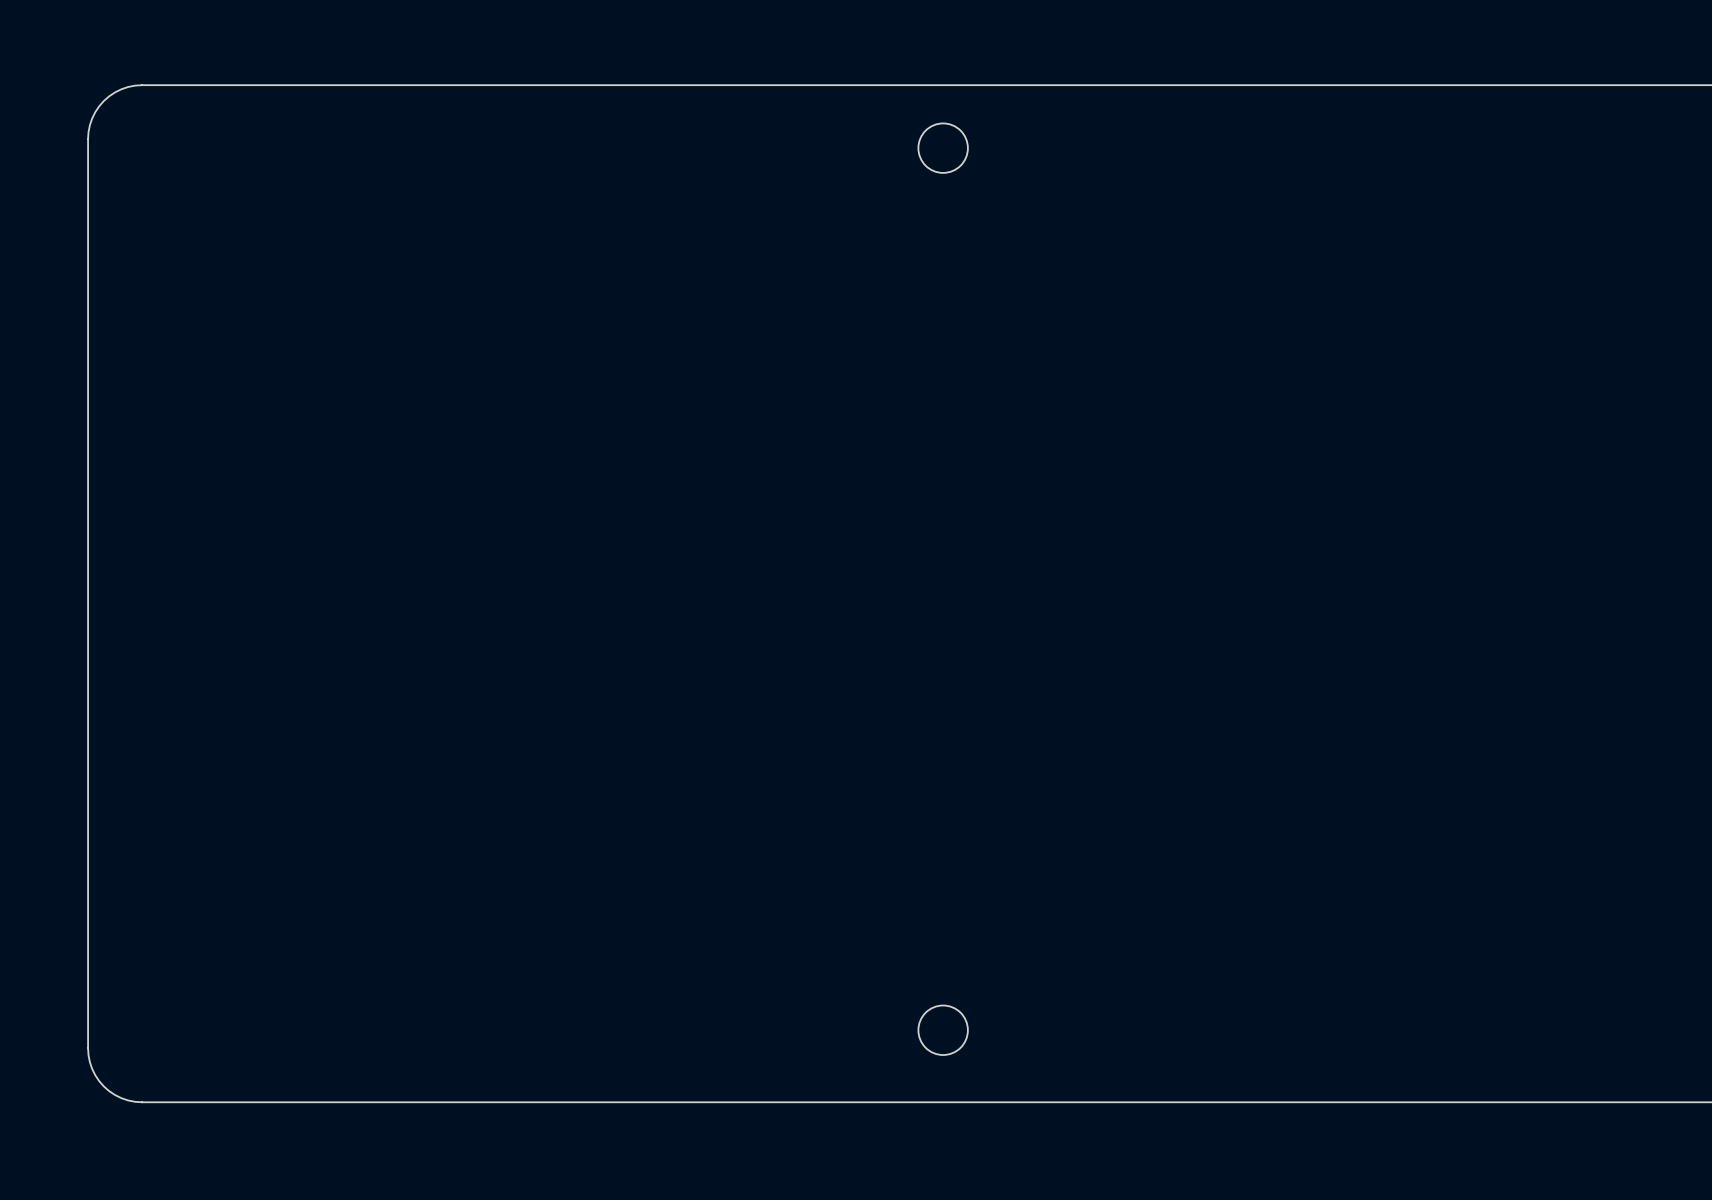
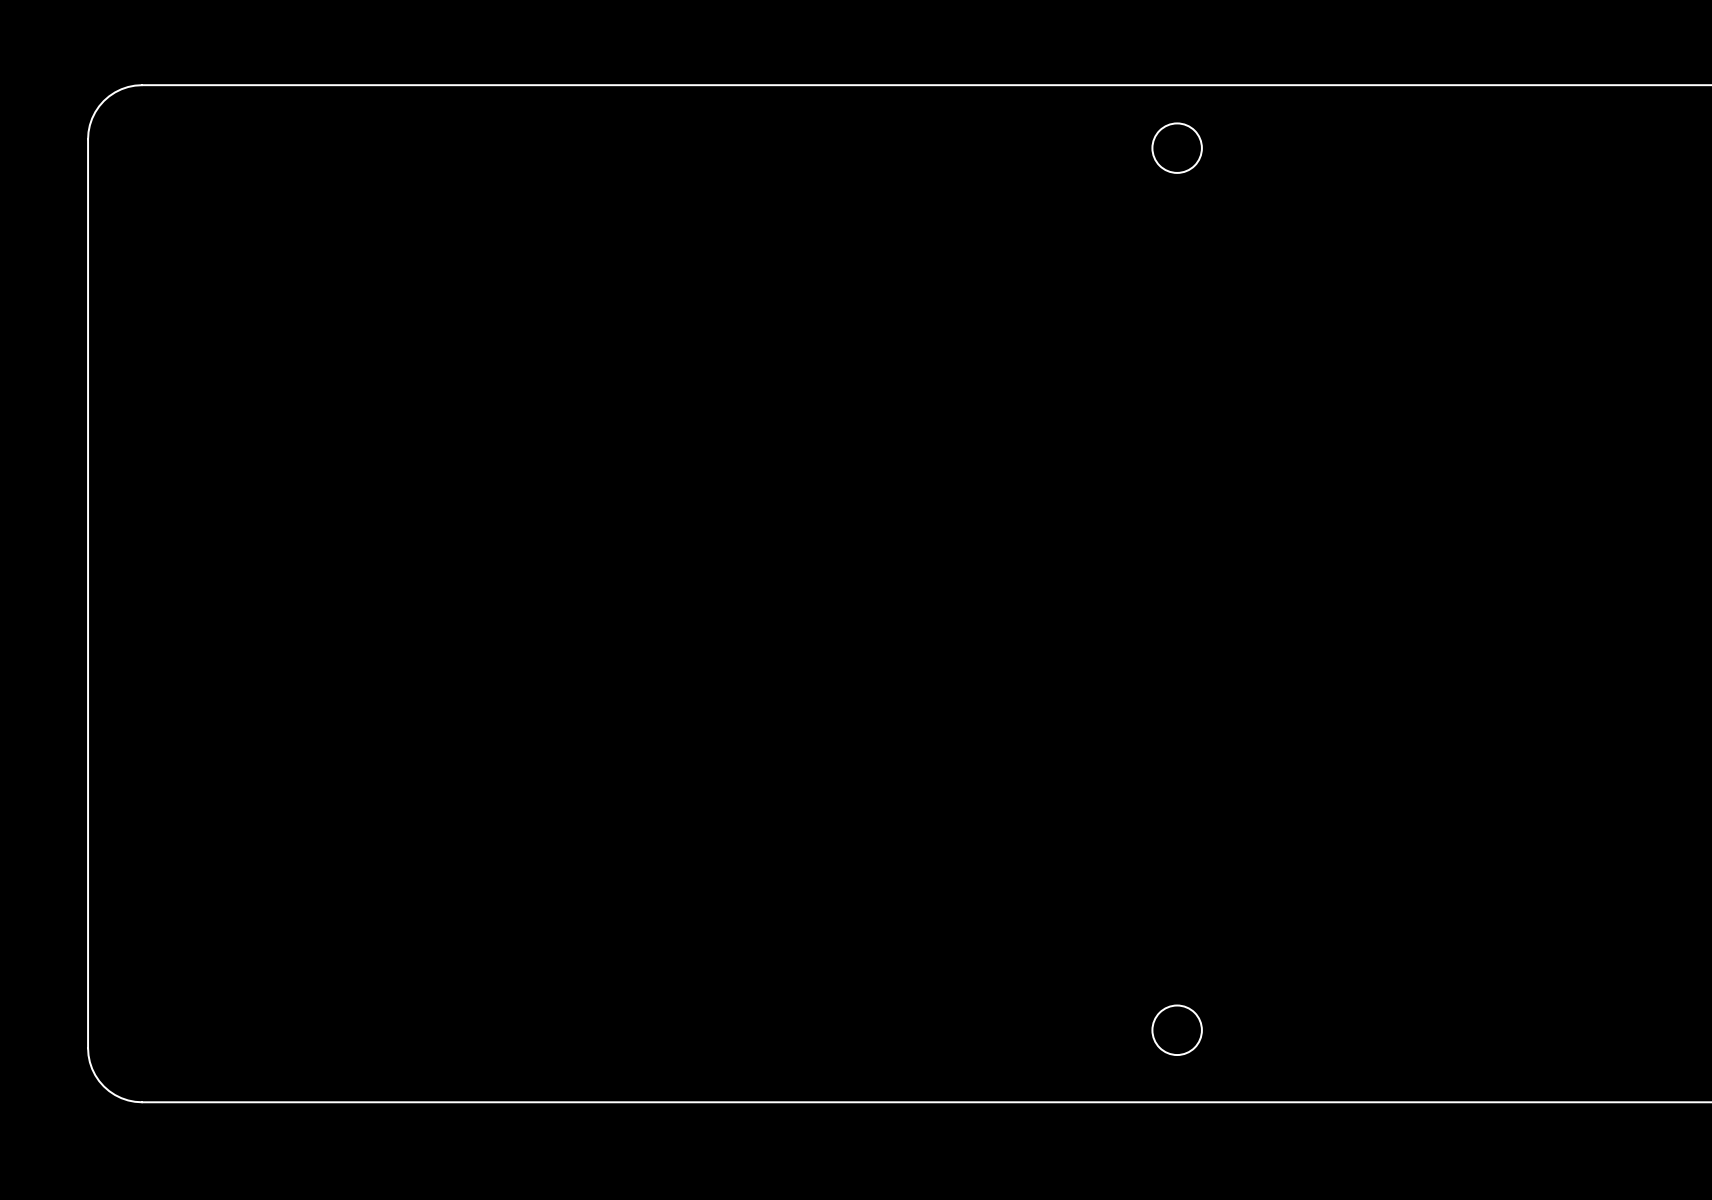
round board edge position: (943, 148) -> (1177, 148)
round board edge position: (943, 1030) -> (1177, 1030)

